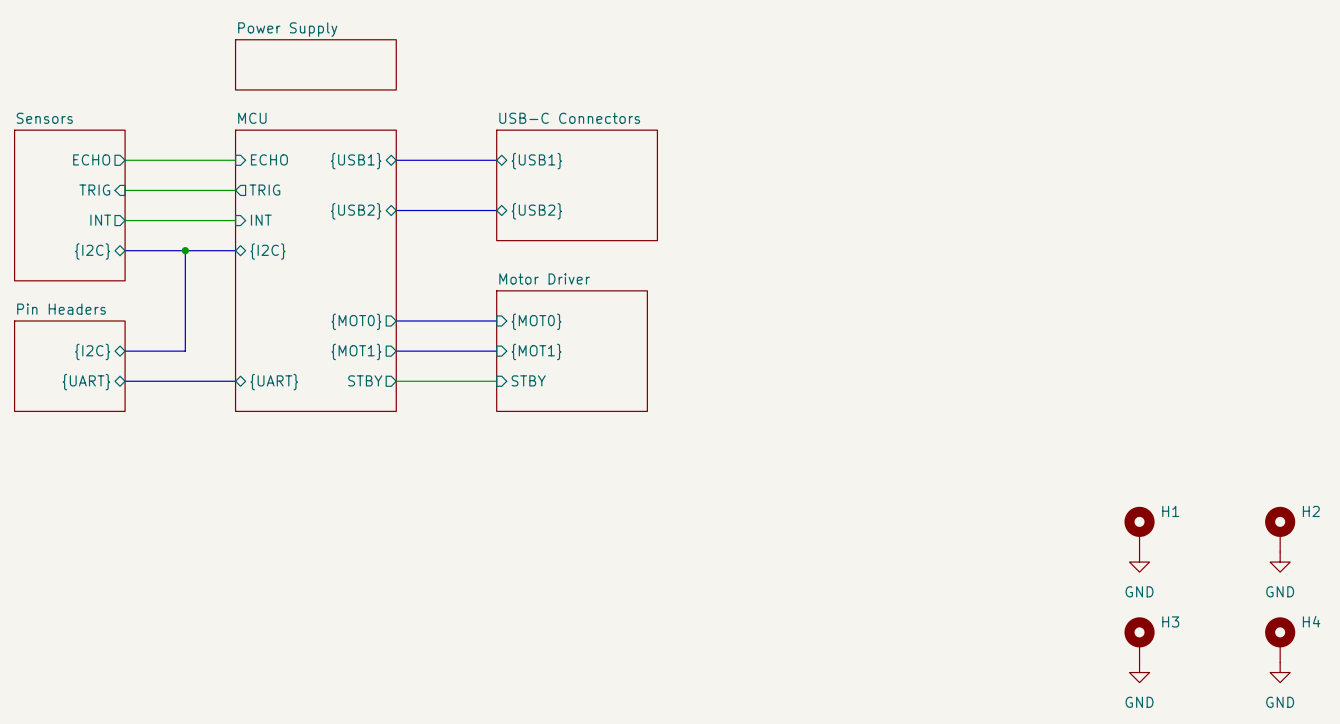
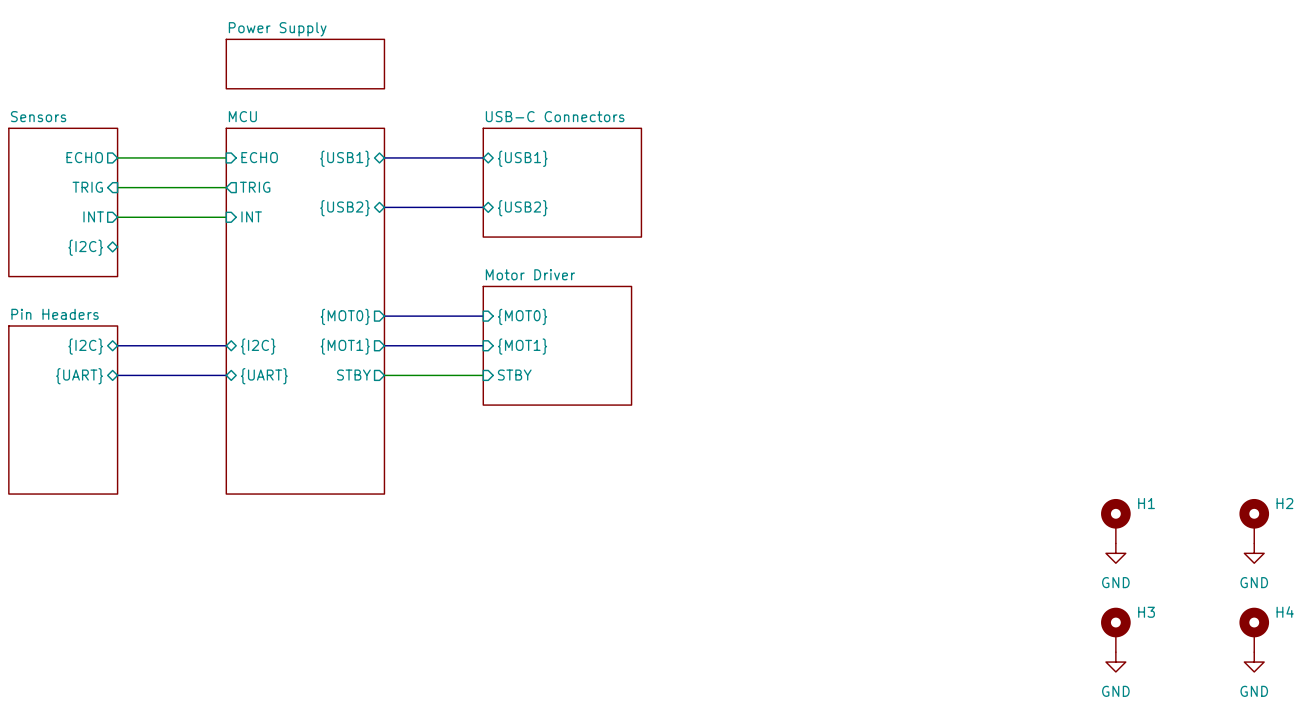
bus: (125, 250) (235, 250) -> none
bus: (185, 250) (185, 351) -> (226, 345) (176, 345)
junction: (185, 250) -> none
sheet pin position: {I2C} (267, 251) -> {I2C} (258, 346)
sheet MCU: (315, 270) -> none
sheet MCU: none -> (305, 311)
sheet Pin Headers: (69, 366) -> none
sheet Pin Headers: none -> (63, 410)

